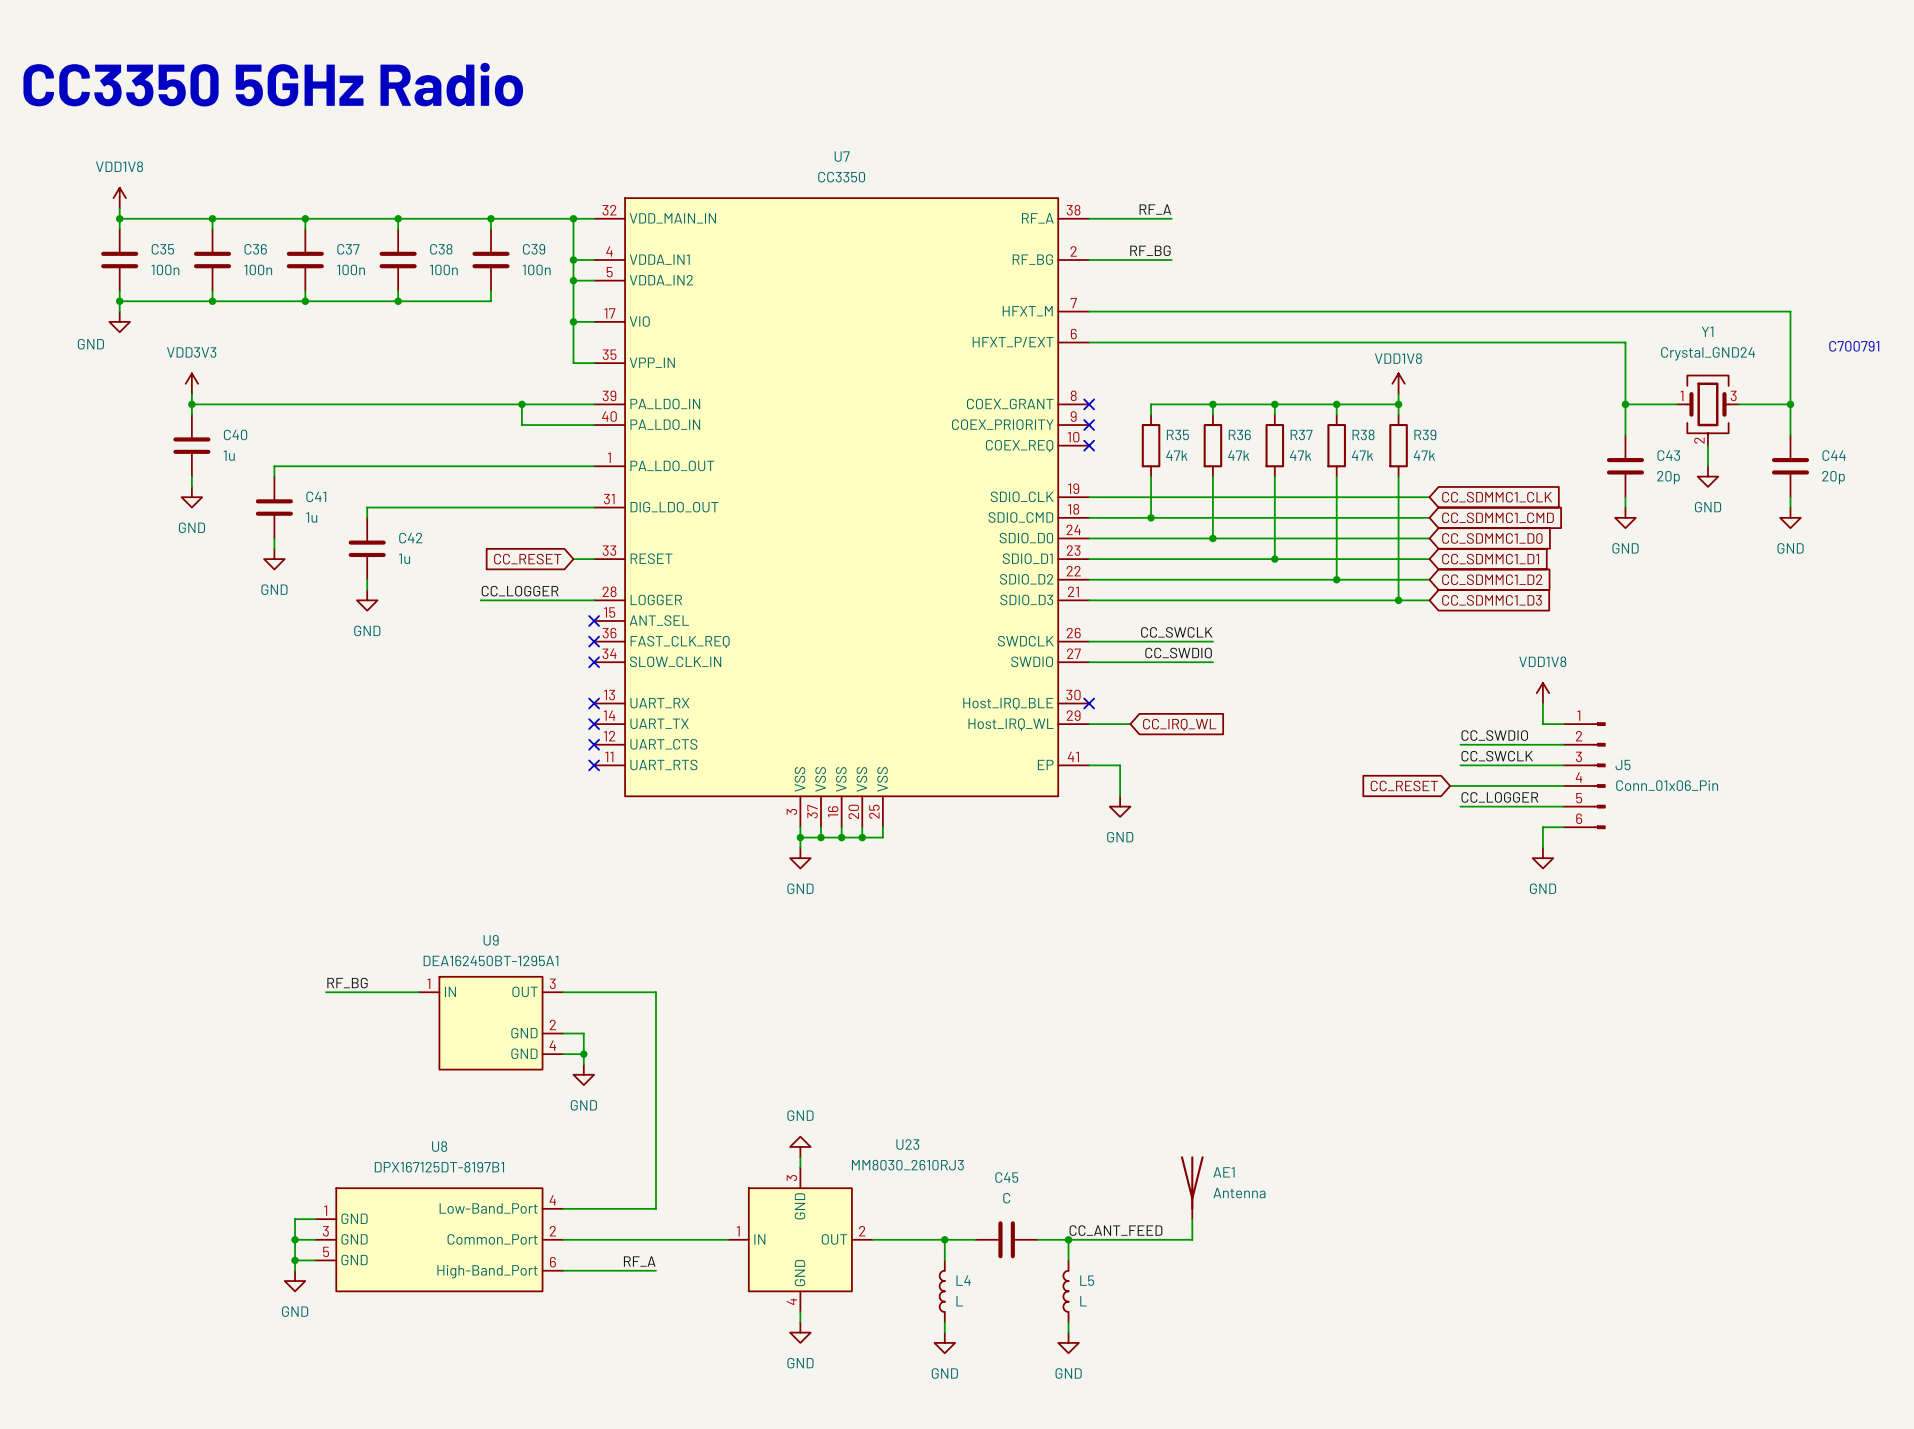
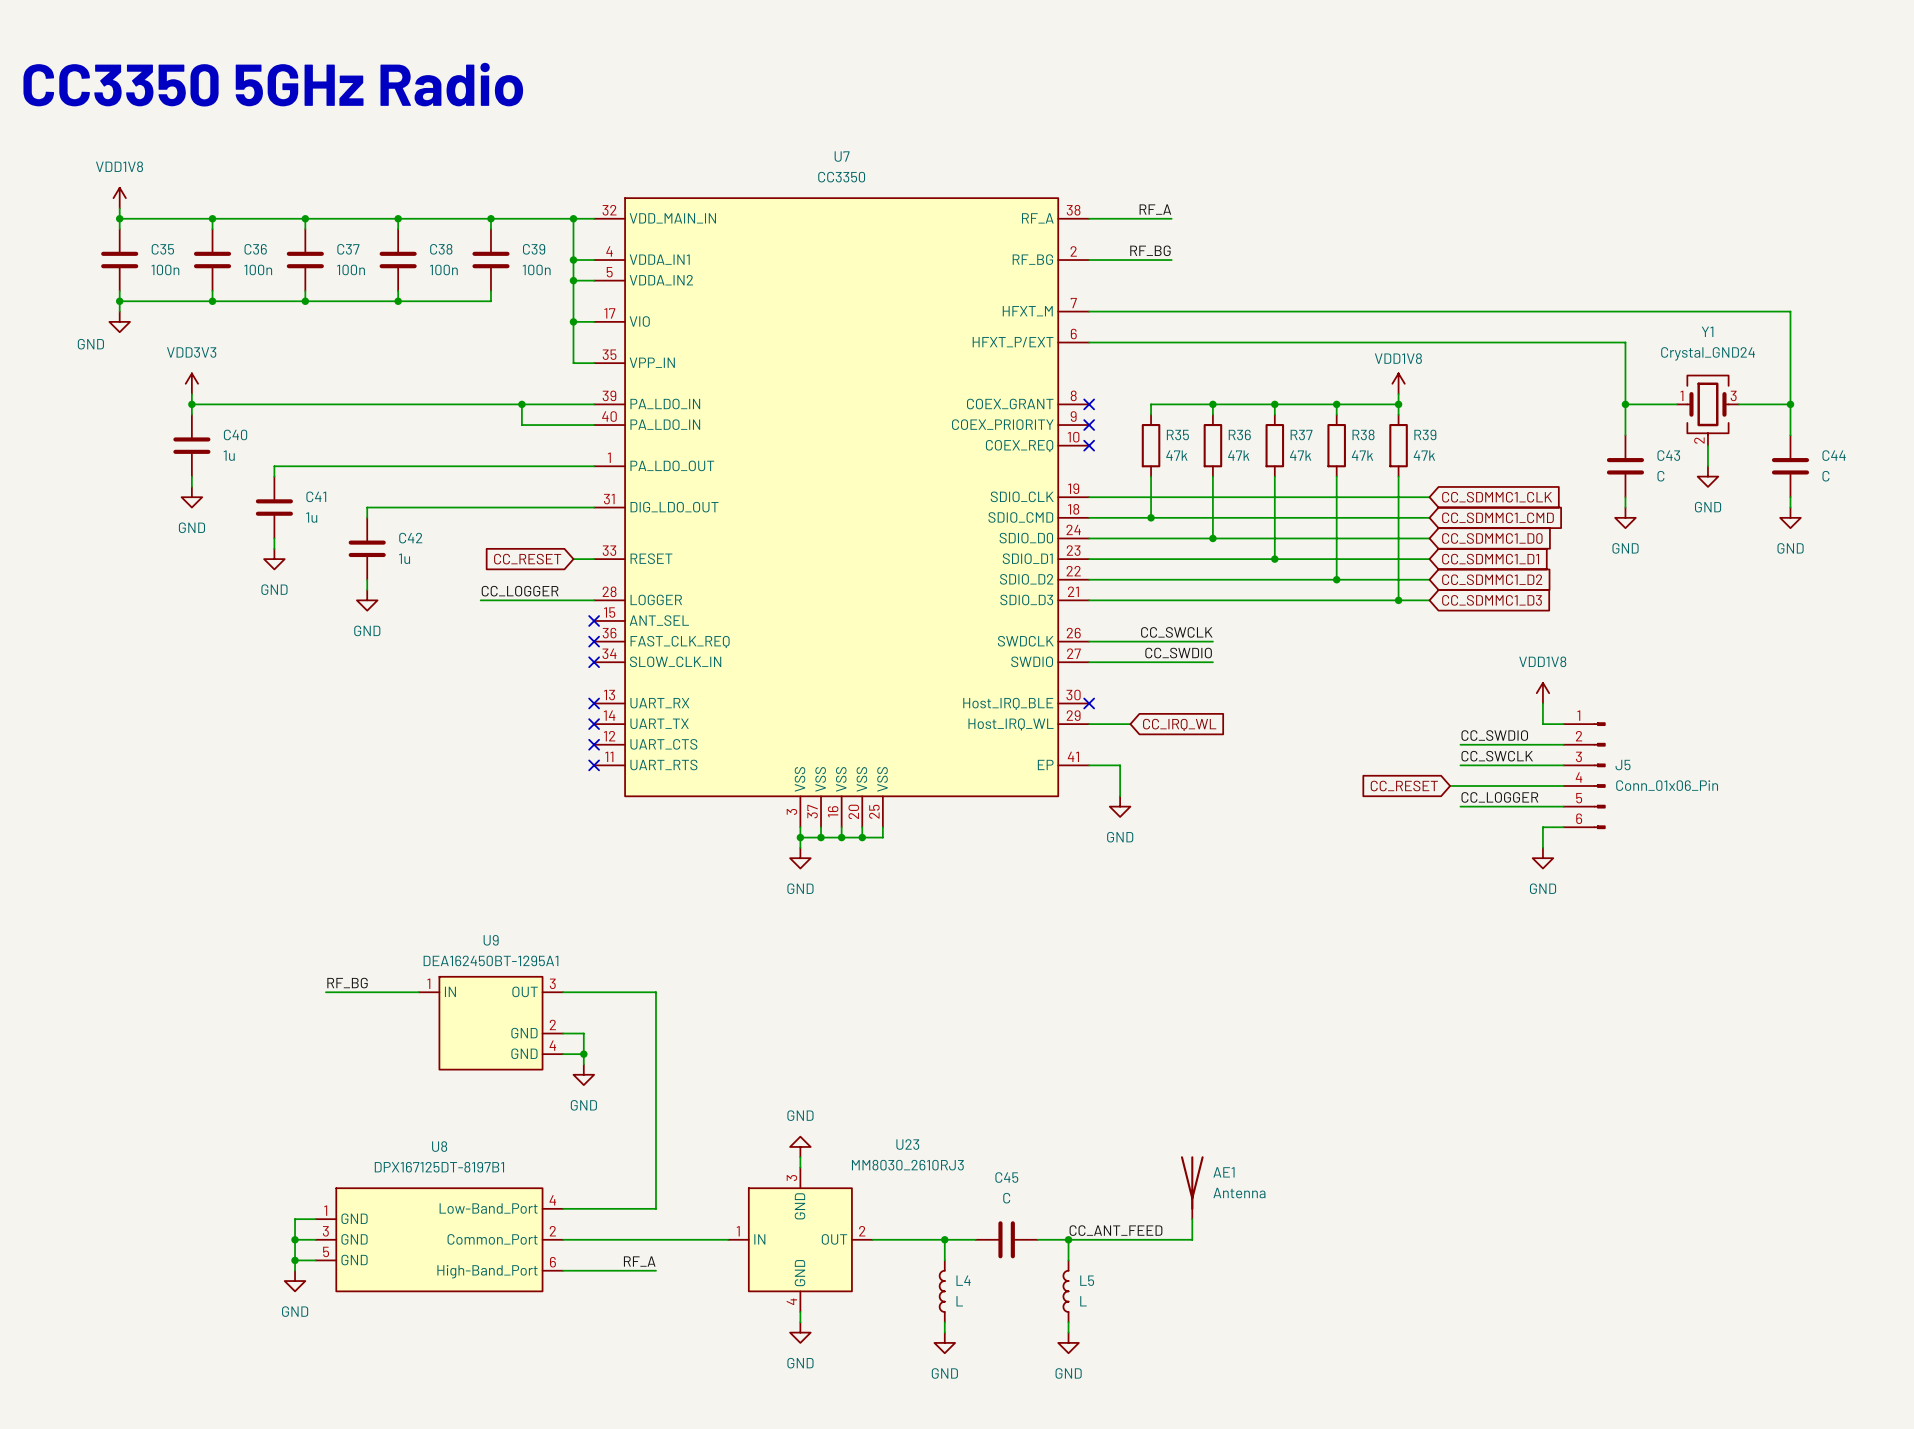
text: C700791 (1854, 346) -> none
C43 value: 20p (1668, 477) -> C (1660, 476)
C44 value: 20p (1833, 477) -> C (1825, 476)

